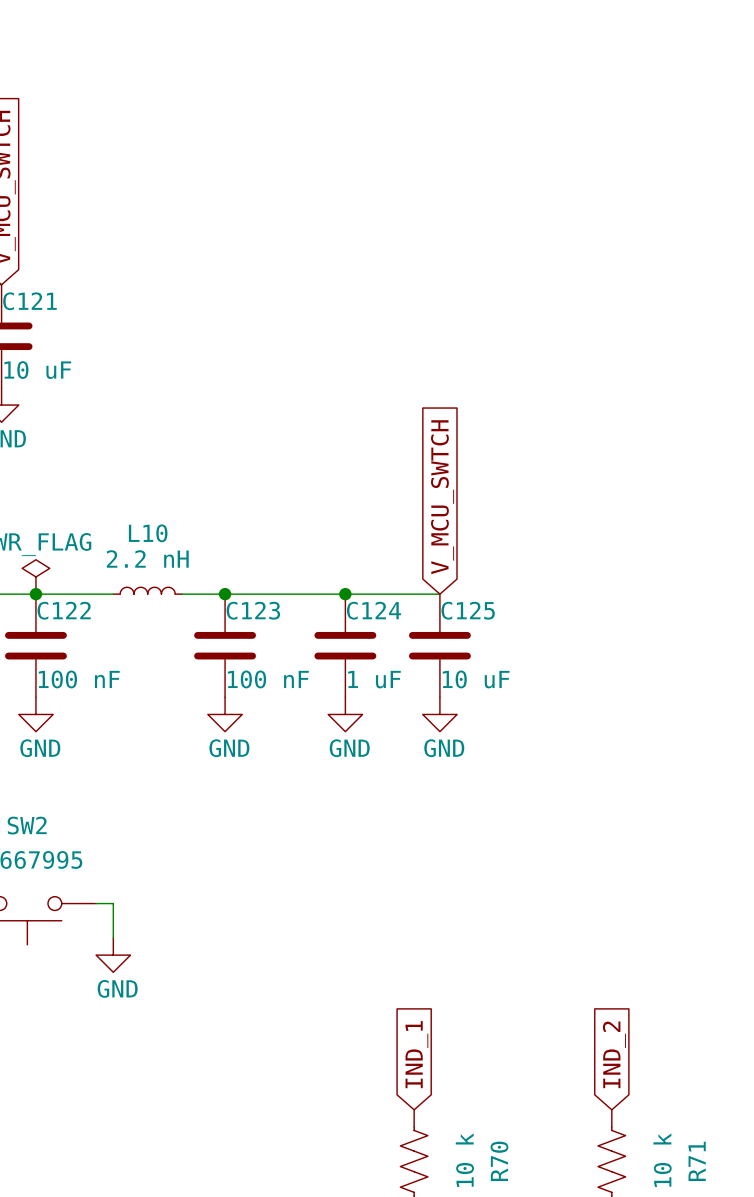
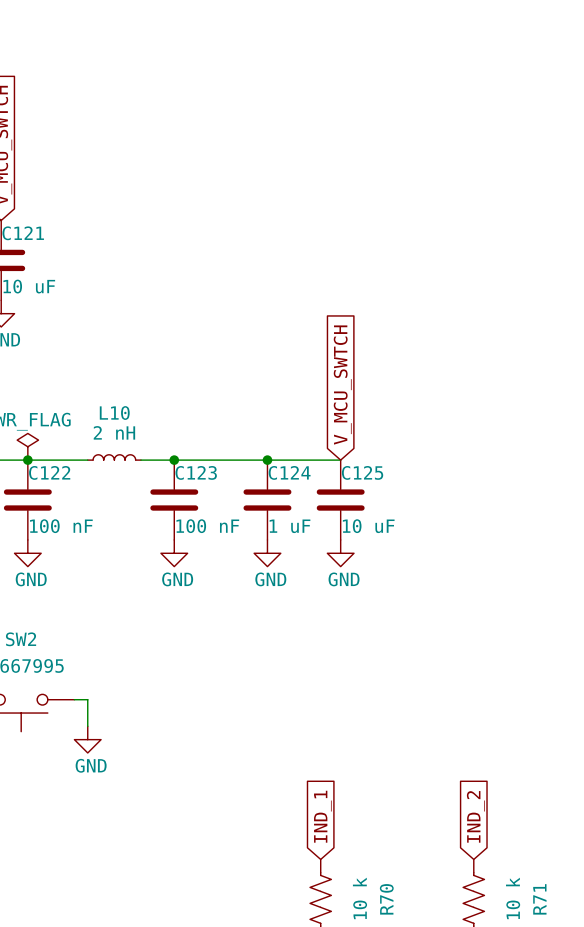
L10 value: 2.2 nH (147, 558) -> 2 nH (114, 432)

